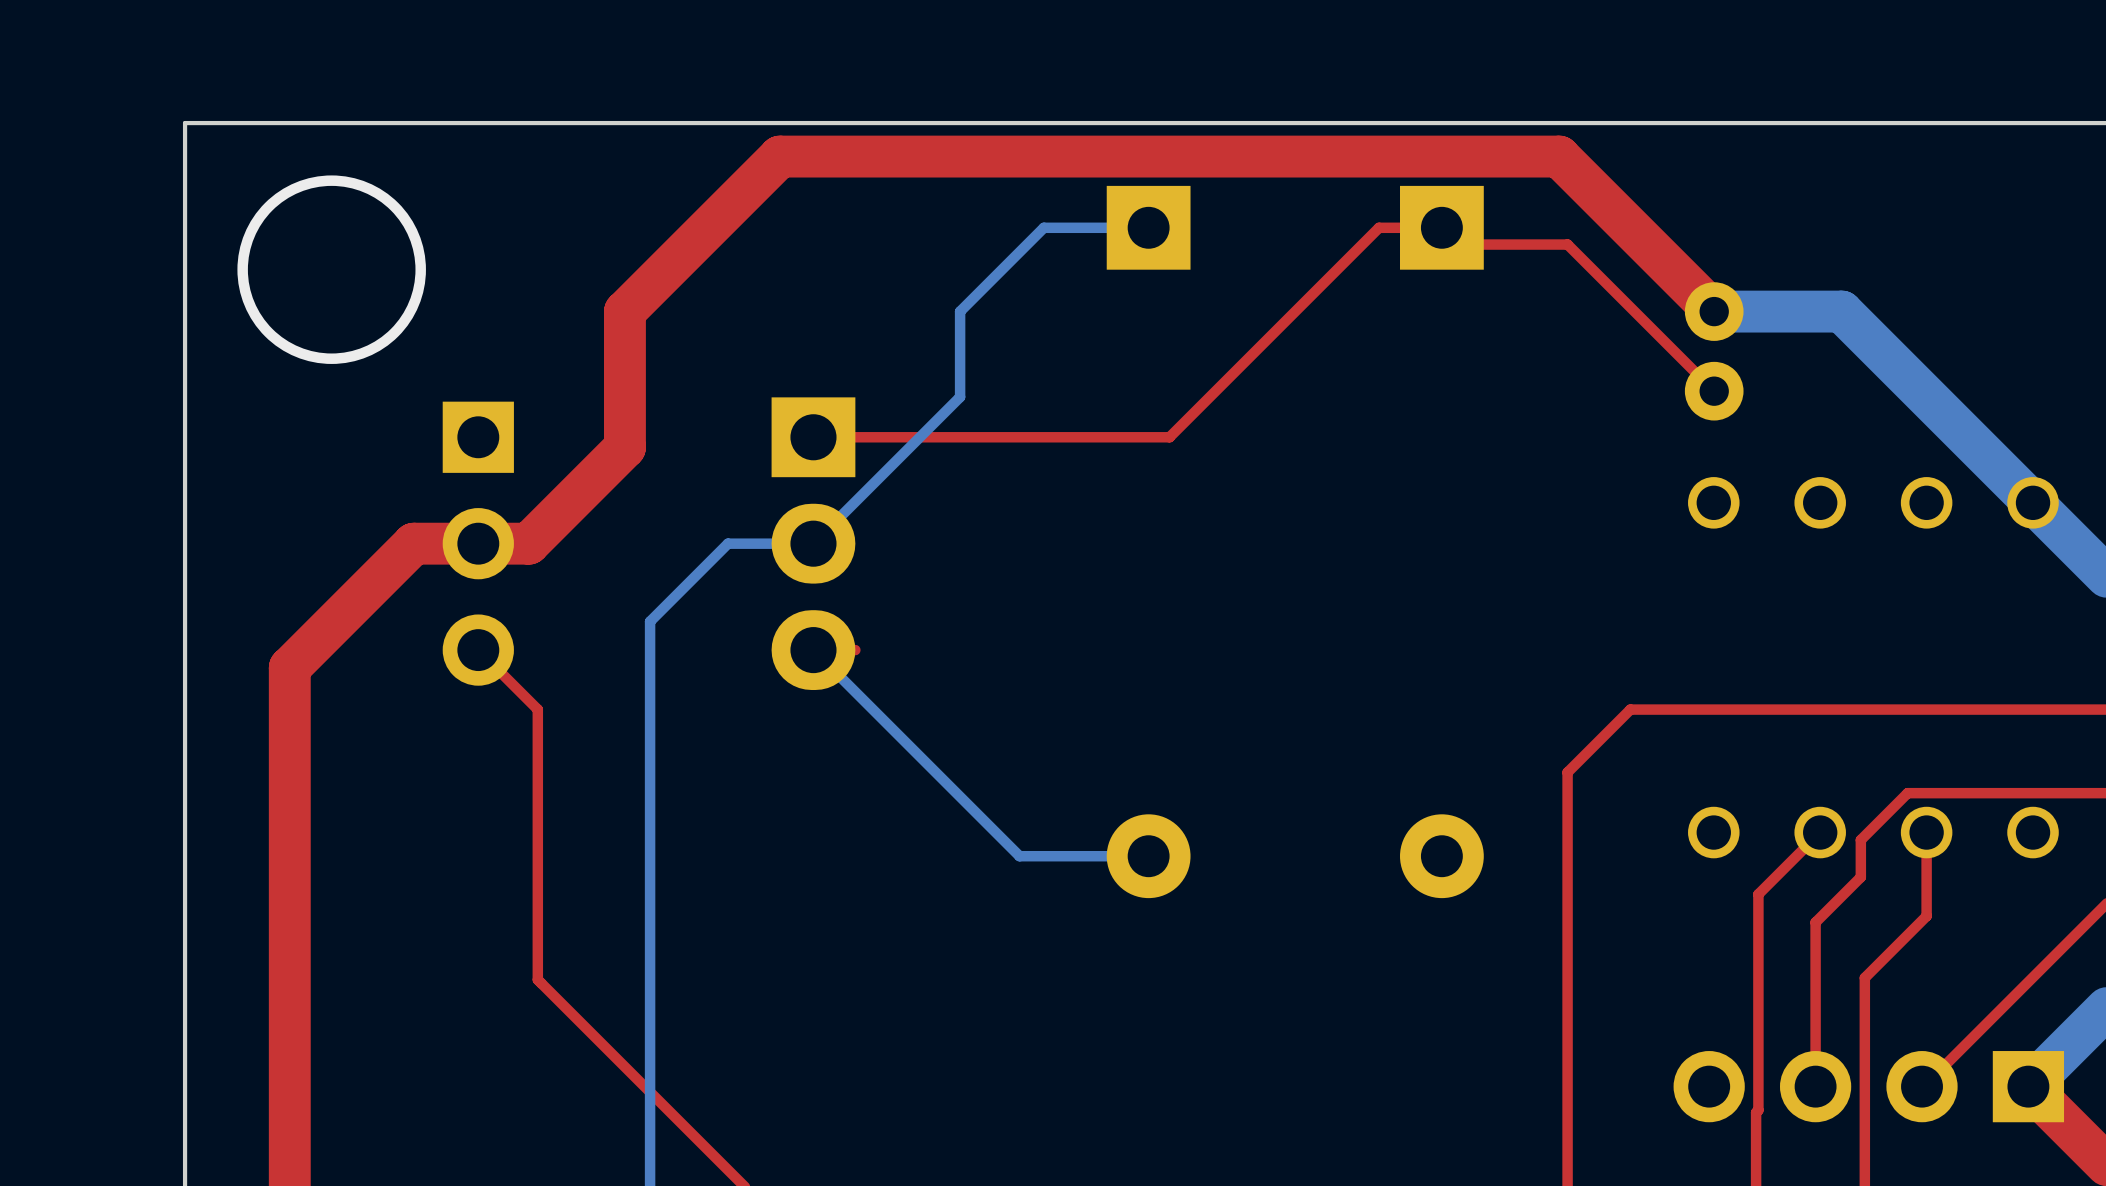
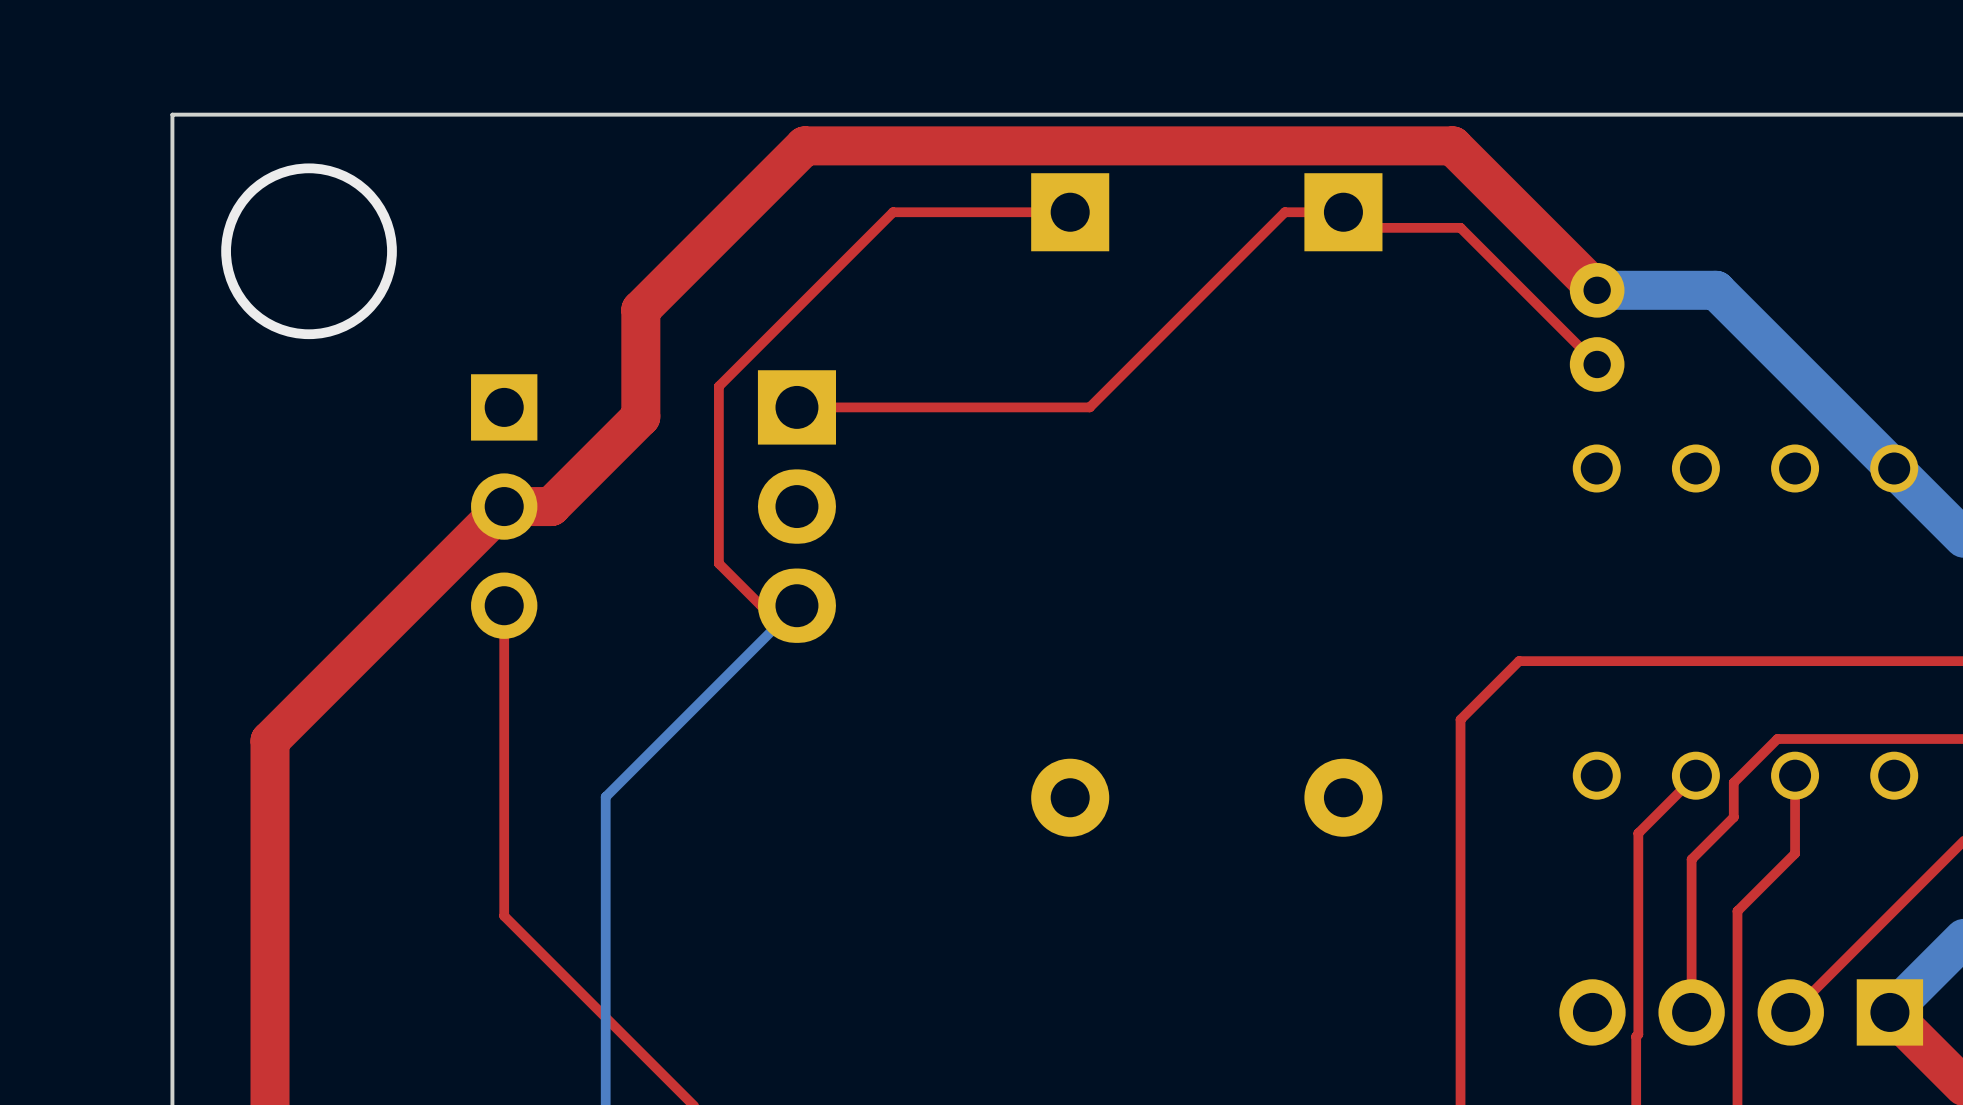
top track: (863, 156) (779, 156) (624, 311) (624, 447) (528, 543) (413, 543) (289, 667) (289, 795) -> (804, 145) (640, 309) (640, 416) (551, 506) (504, 506) (270, 740)
top track: none -> (1070, 212) (893, 212) (718, 386) (718, 563) (761, 605)
bottom track: (1148, 227) (1043, 227) (960, 311) (960, 397) (813, 543) (728, 543) (650, 621) (650, 855) -> (796, 605) (605, 796)
part position: (478, 543) -> (504, 506)
part position: (813, 543) -> (796, 506)
top track: (478, 650) (537, 709) (537, 979) (541, 983) -> (504, 605) (504, 916)
bottom track: (813, 650) (1019, 856) (1148, 856) -> none

